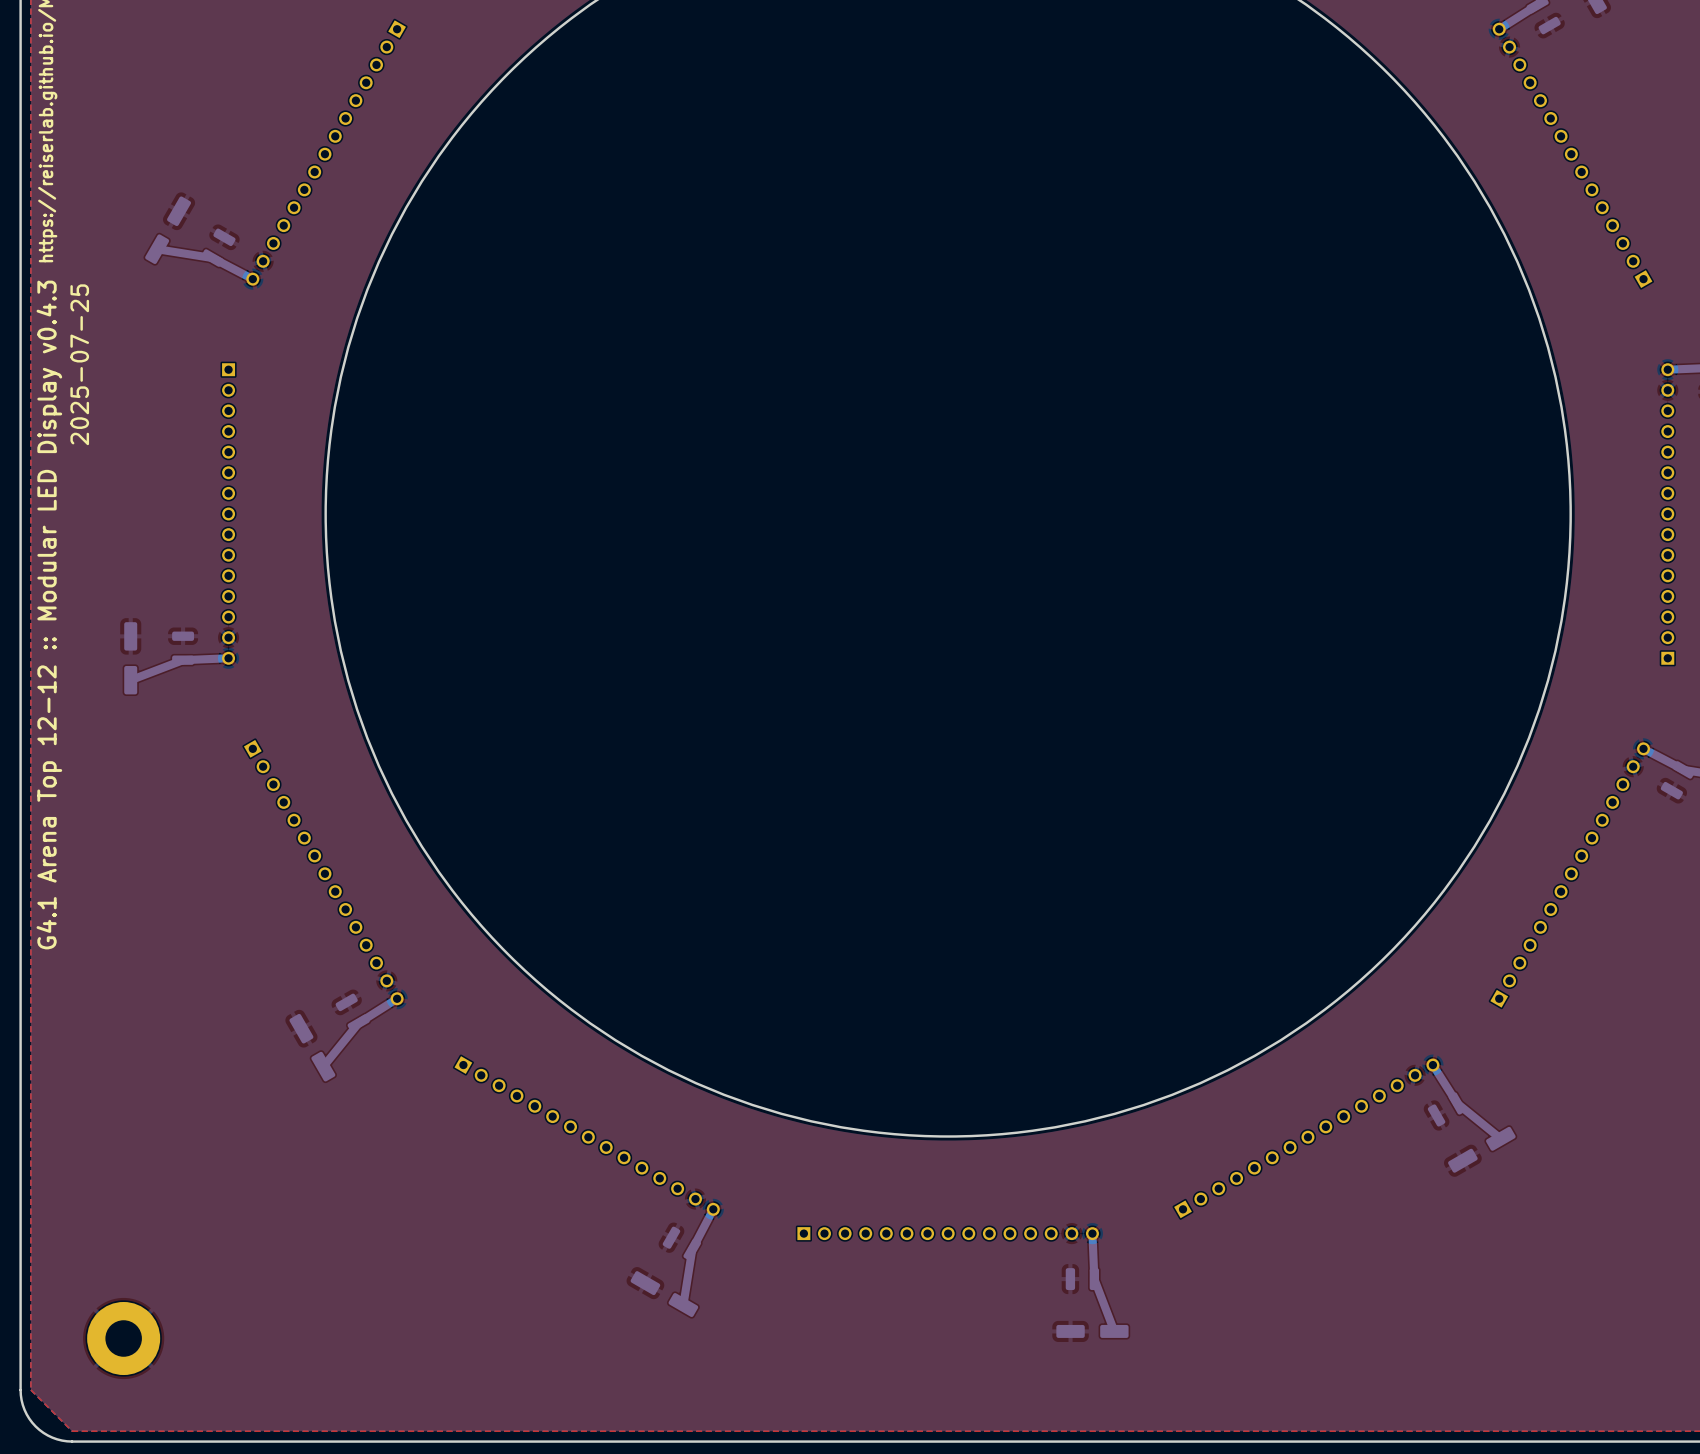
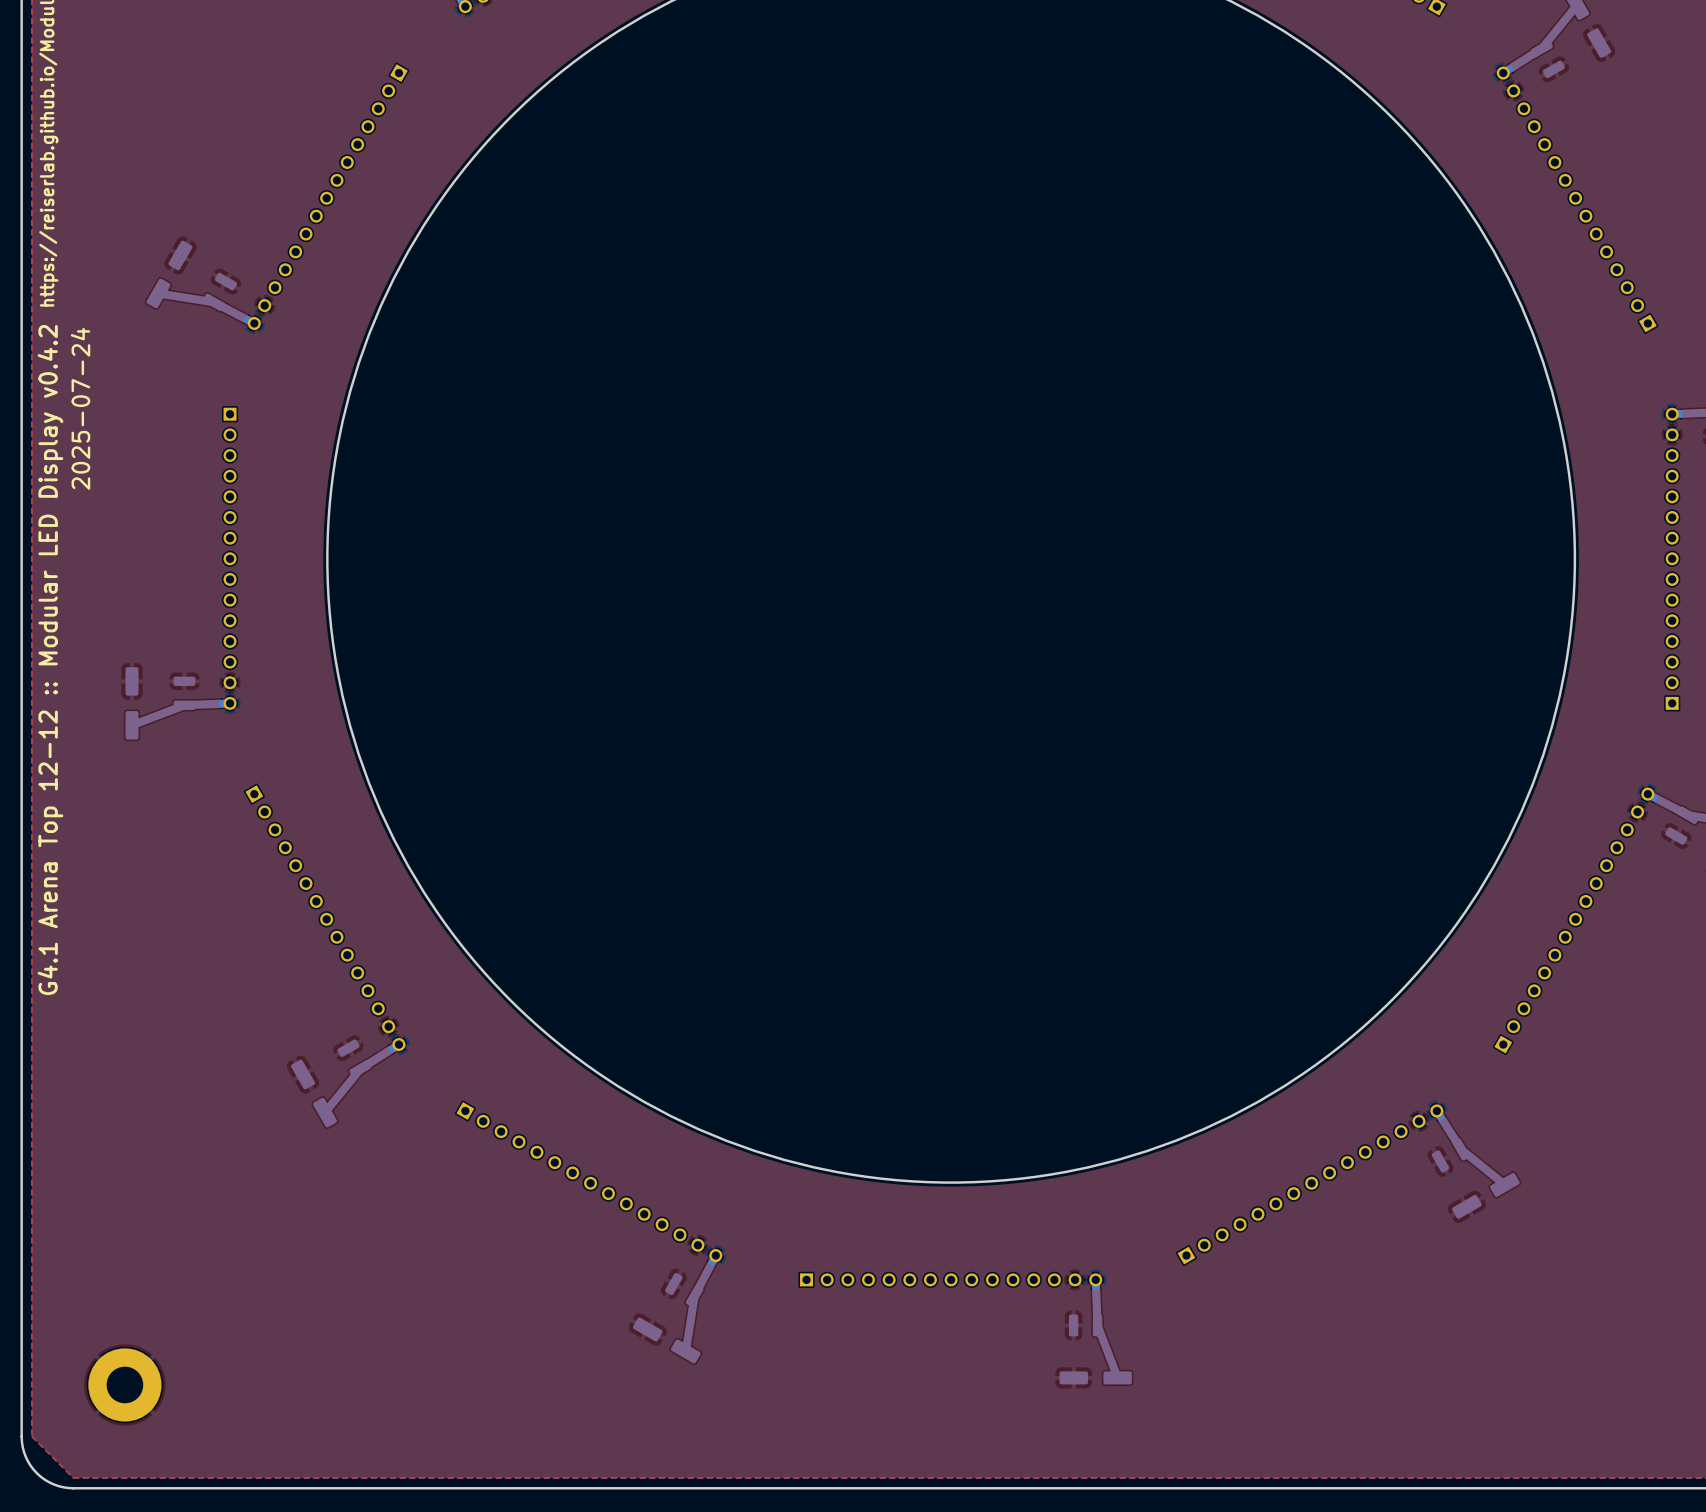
text: 2025-07-25 (79, 364) -> 2025-07-24 (80, 408)
text: G4.1 Arena Top 12-12 :: Modular LED Display v0.4.3 (49, 615) -> G4.1 Arena Top 12-12 :: Modular LED Display v0.4.2 (50, 660)

